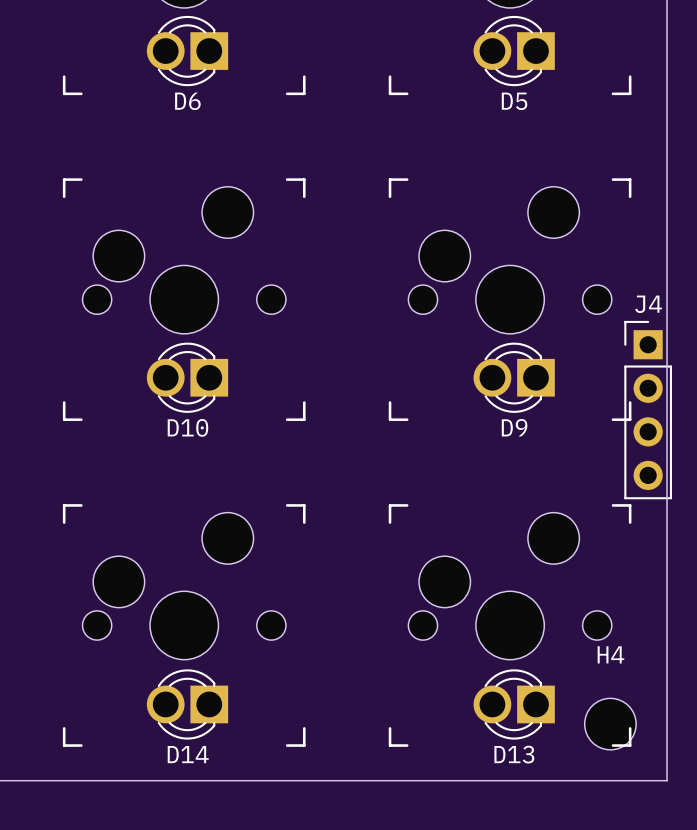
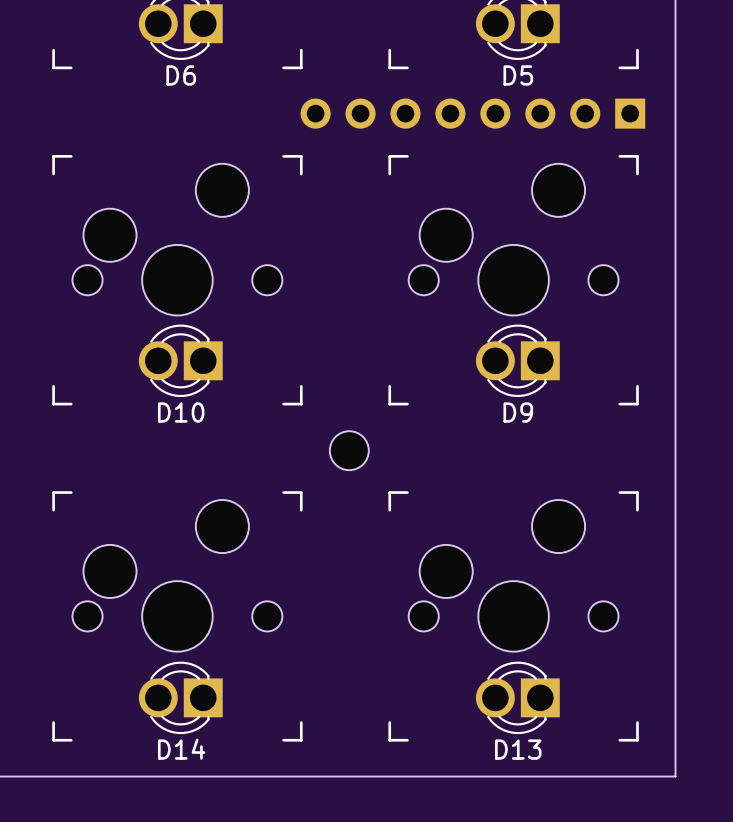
part: none -> (472, 113)
J4: (648, 410) -> none
part: none -> (349, 450)
H4: (610, 724) -> none

